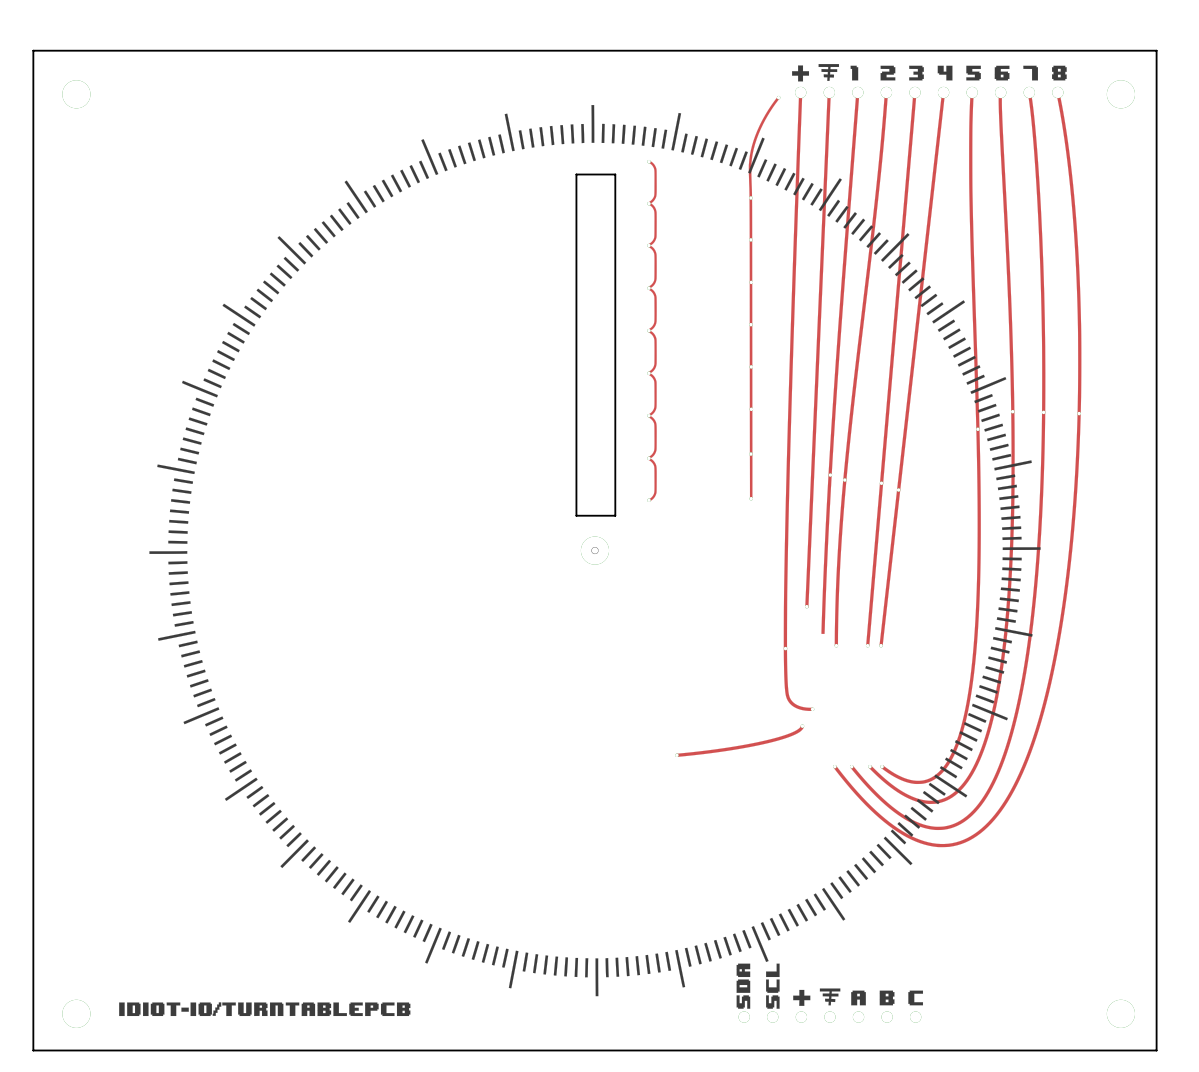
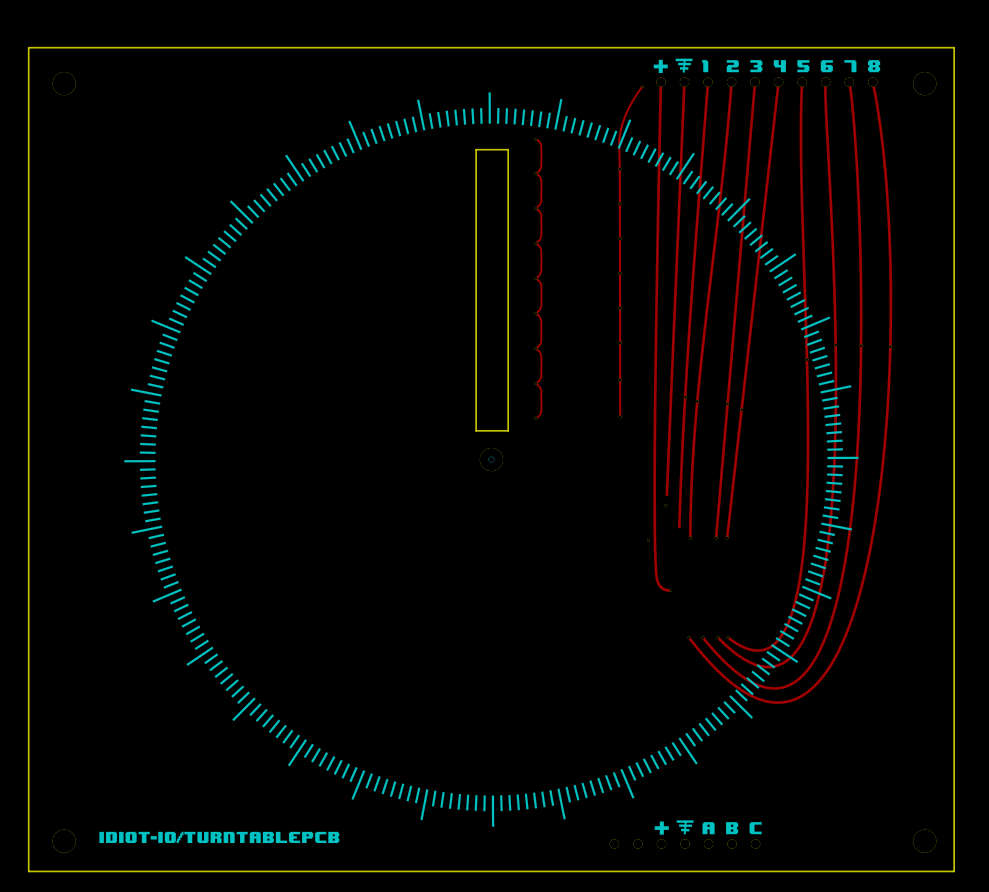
drawing shape: [119, 64, 1067, 1017] -> [99, 58, 881, 844]
drawing shape: [648, 92, 1082, 848] -> [535, 81, 893, 704]
part: (802, 726) -> none
part: (676, 755) -> none

